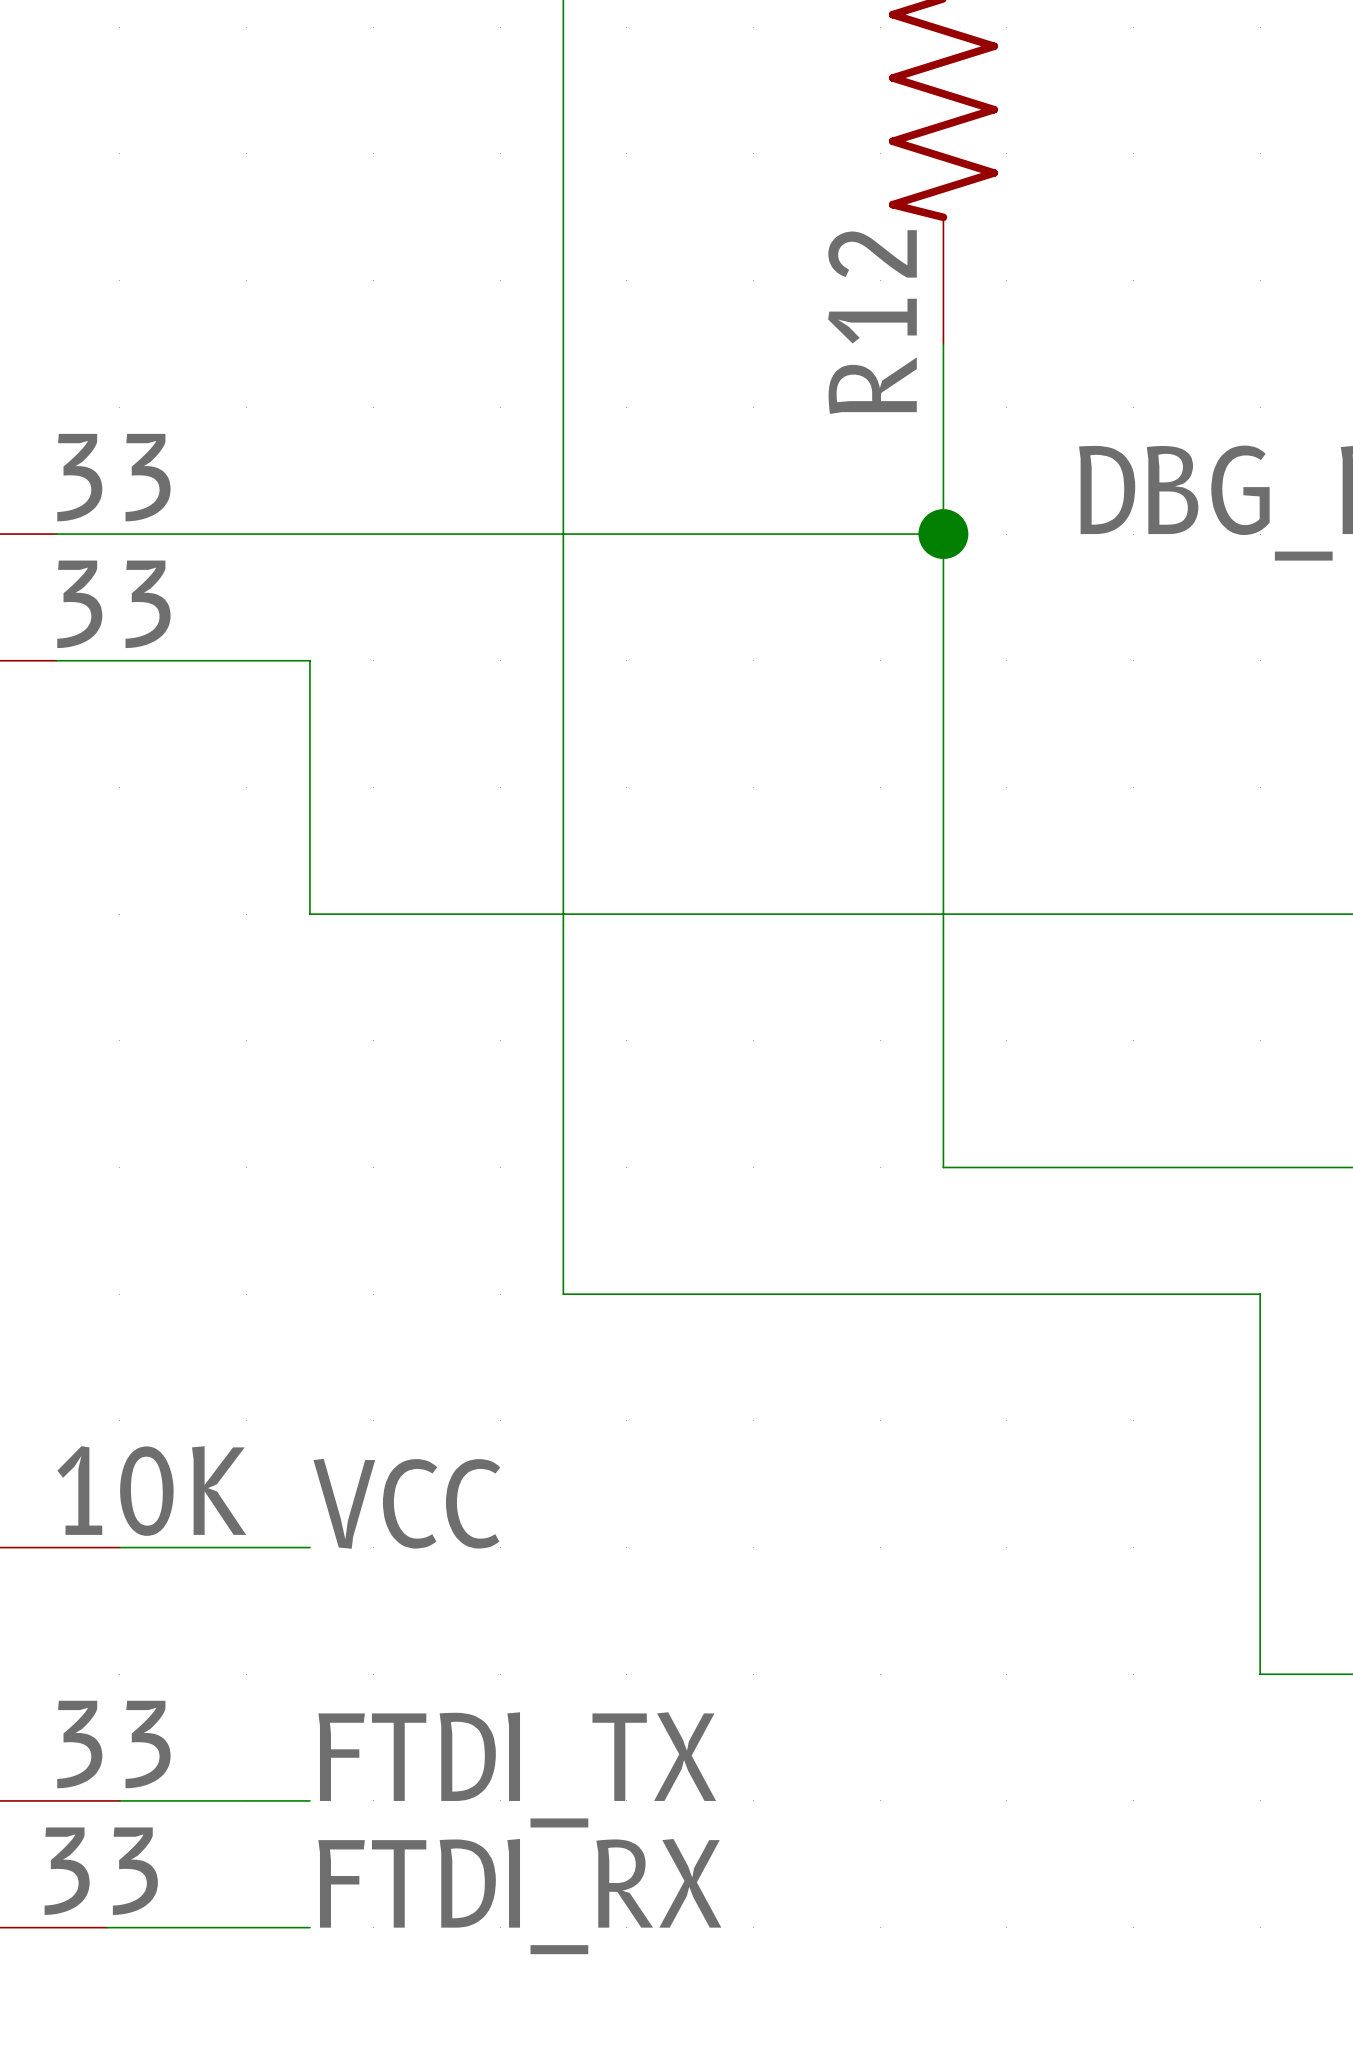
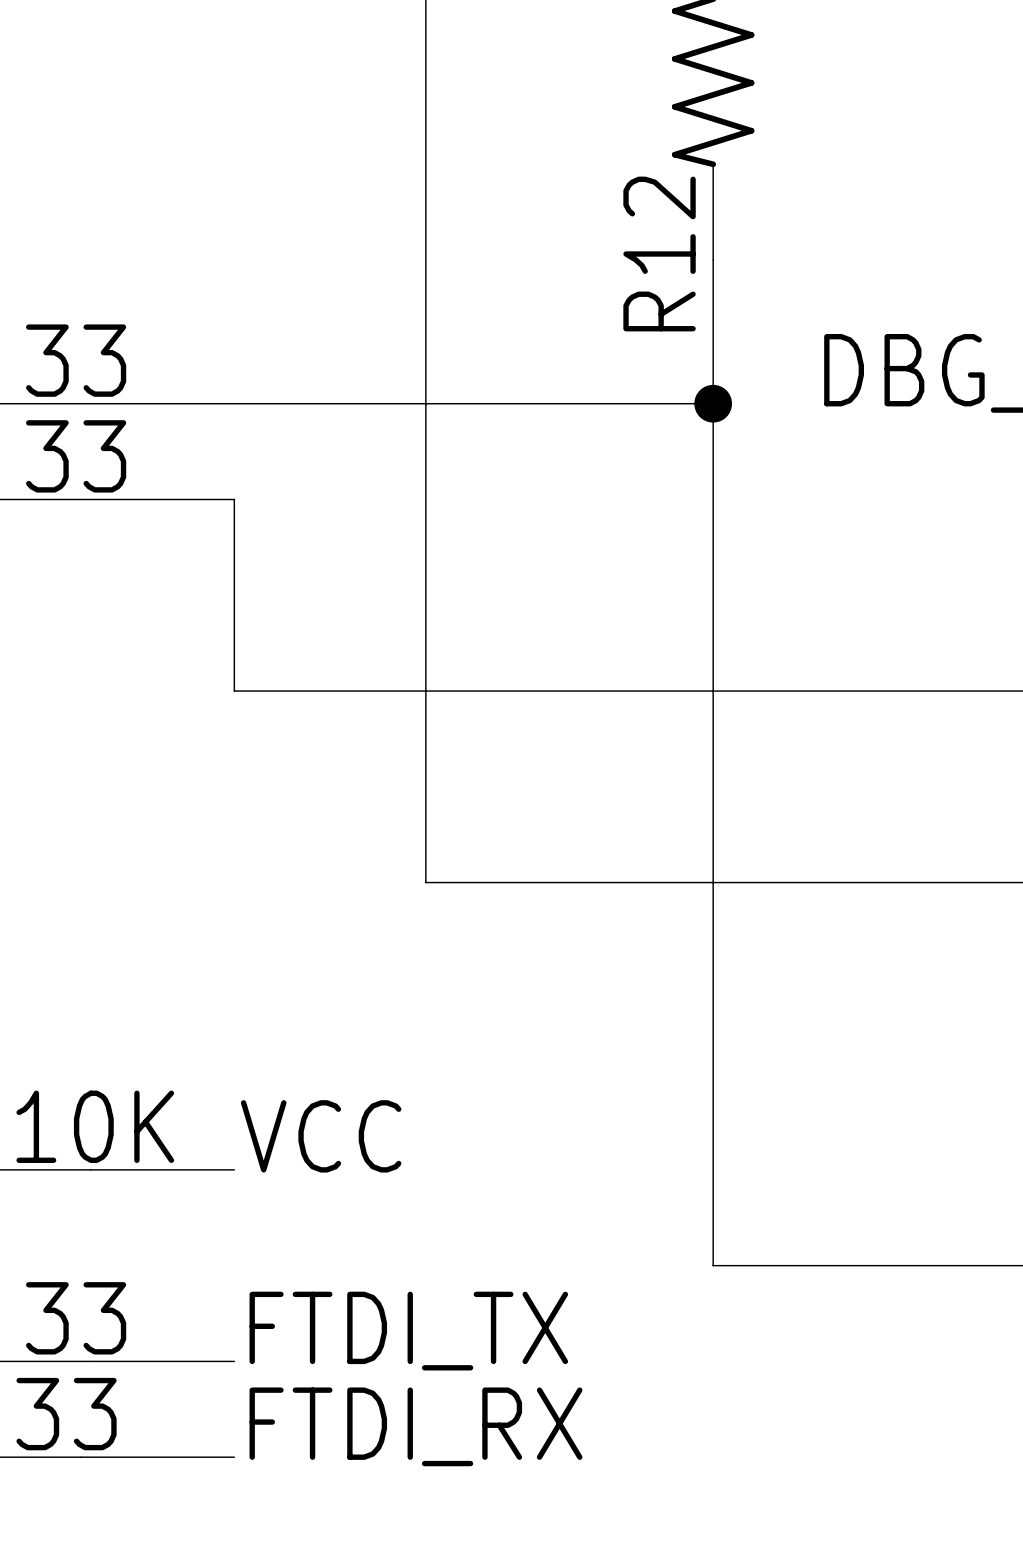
wire: (563, 1167) (563, 1294) (1260, 1294) (1260, 1674) -> (425, 882) (713, 882) (713, 1265) (952, 1265)

